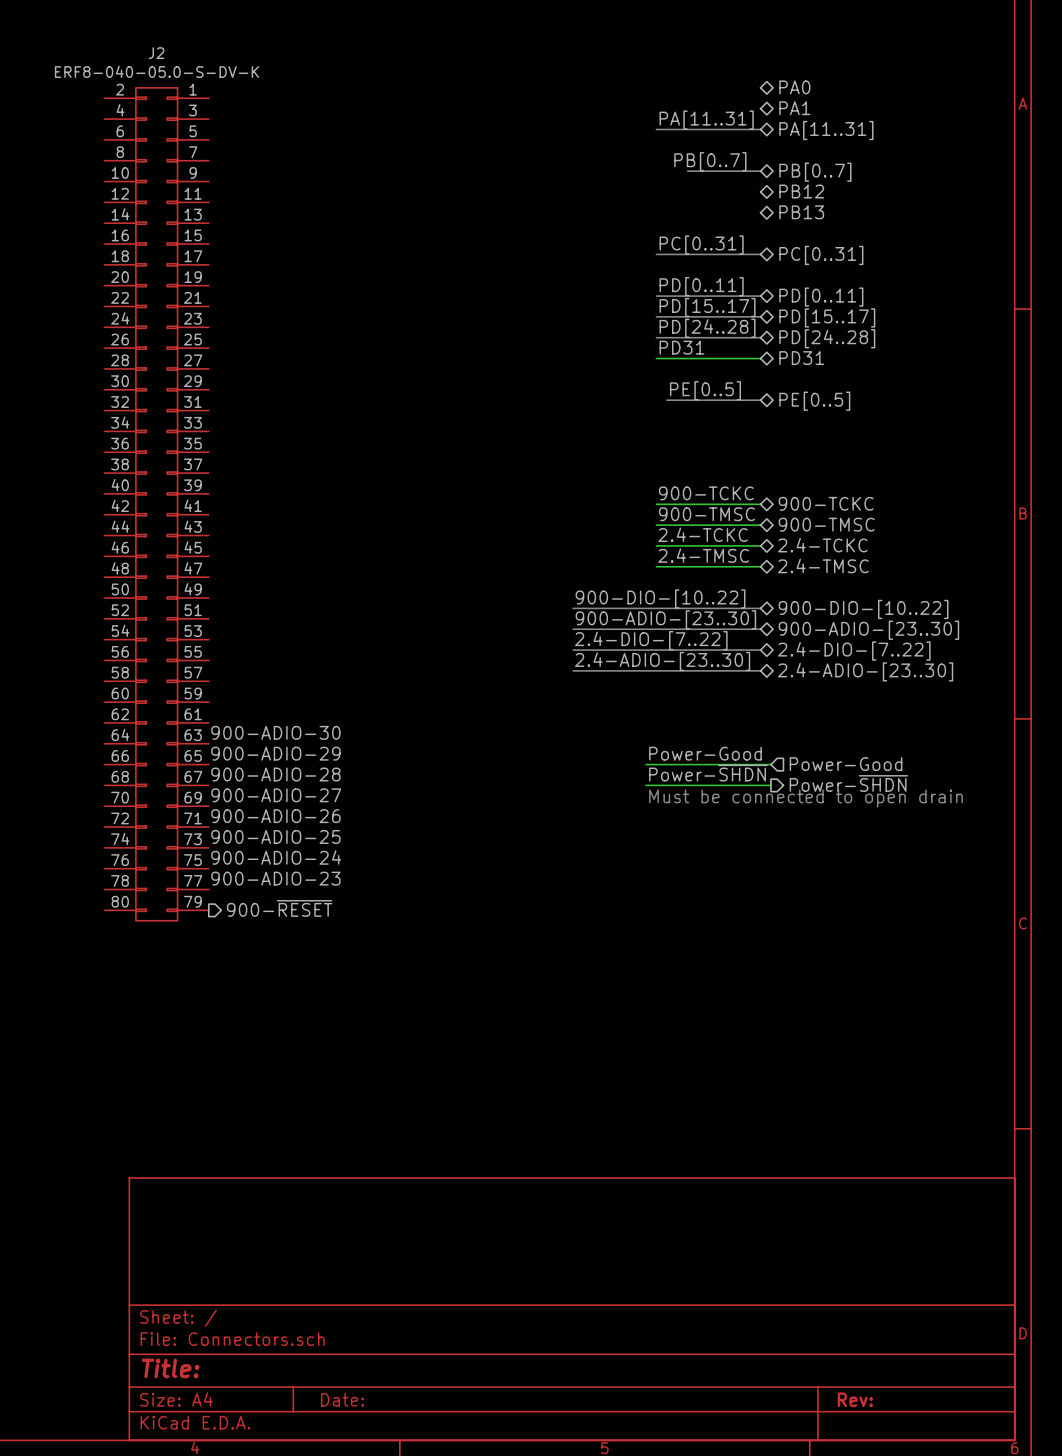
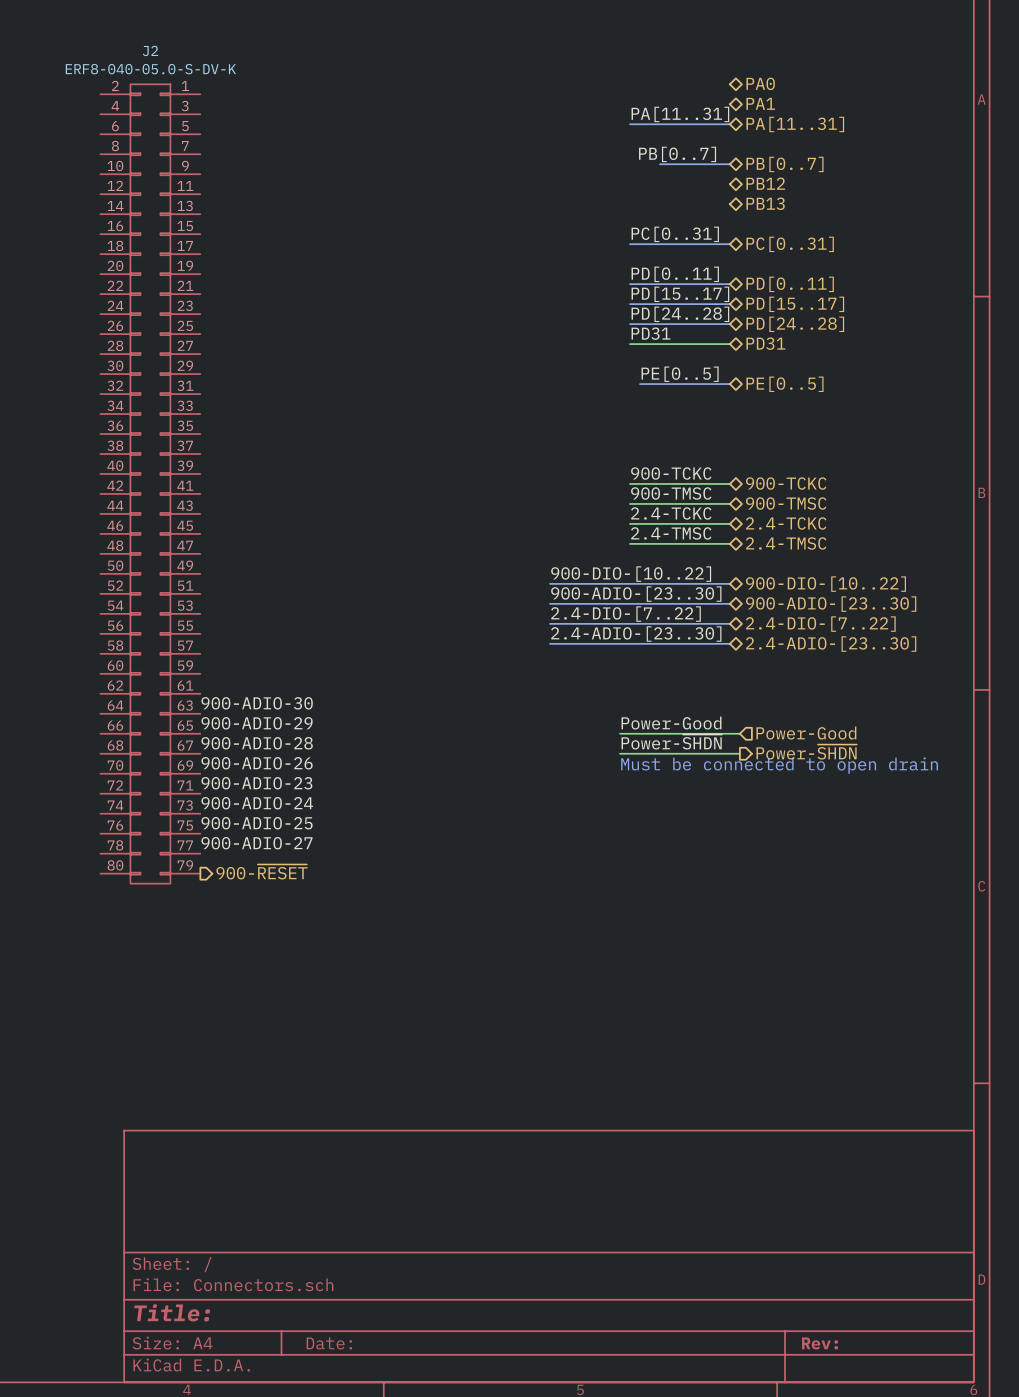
label: 900-ADIO-27 (276, 795) -> 900-ADIO-26 (257, 763)
label: 900-ADIO-26 (275, 816) -> 900-ADIO-23 (256, 783)
label: 900-ADIO-25 (275, 836) -> 900-ADIO-24 (257, 803)
label: 900-ADIO-24 (276, 857) -> 900-ADIO-25 (257, 823)
label: 900-ADIO-23 (275, 878) -> 900-ADIO-27 (257, 843)

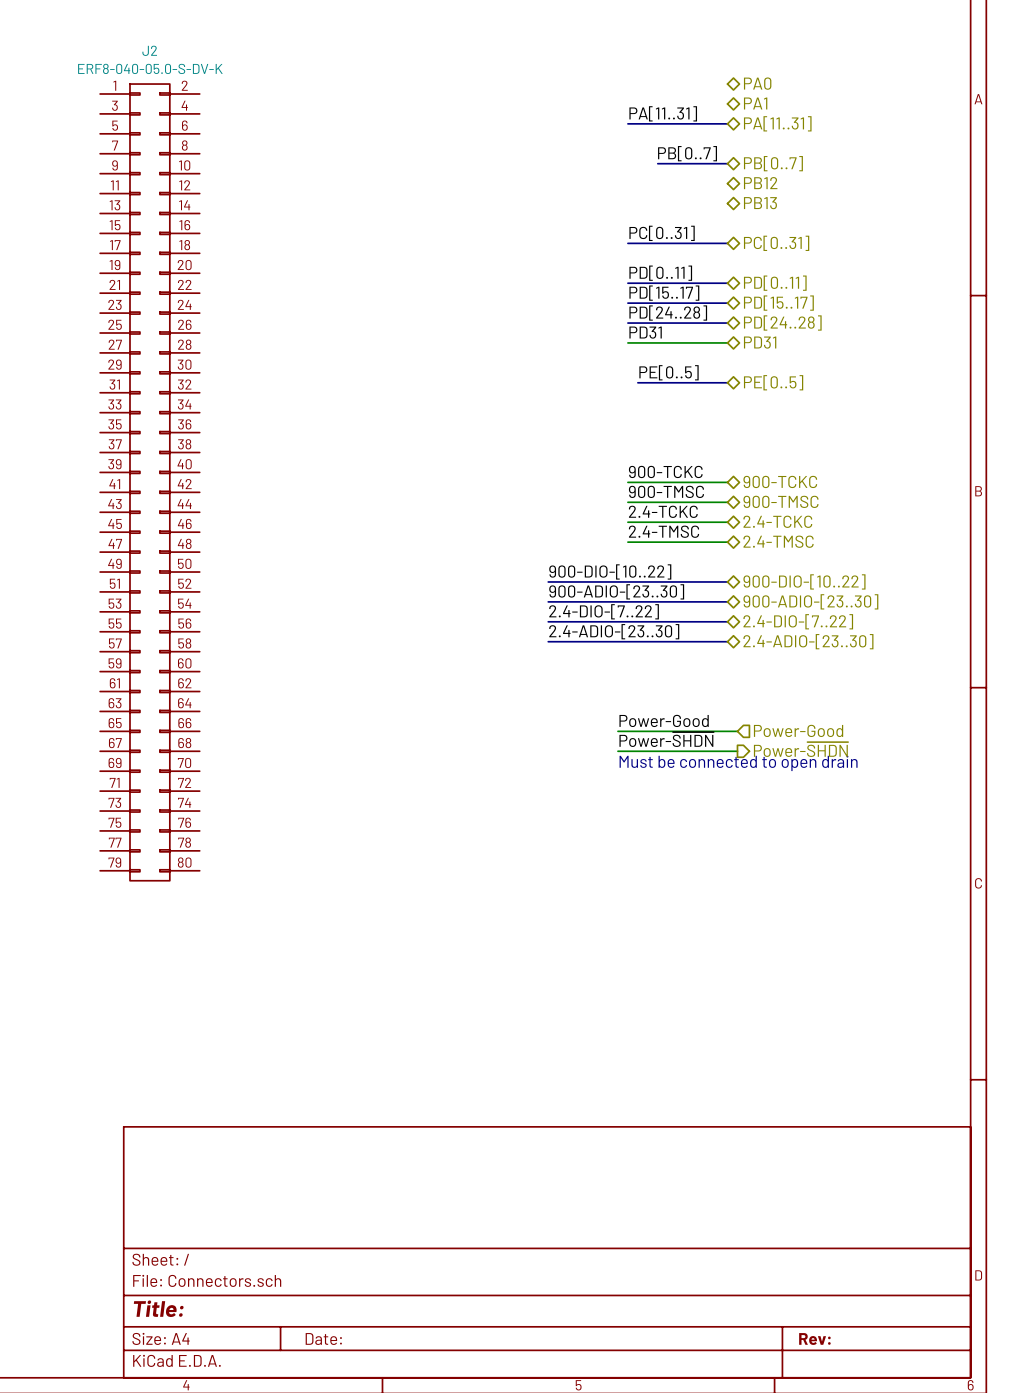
J2 flip: as is (150, 483) -> left-right (149, 482)
label: 900-ADIO-30 (257, 703) -> none
label: 900-ADIO-29 (257, 723) -> none
label: 900-ADIO-28 (257, 743) -> none
label: 900-ADIO-26 (257, 763) -> none
label: 900-ADIO-23 (256, 783) -> none
label: 900-ADIO-24 (257, 803) -> none
label: 900-ADIO-25 (257, 823) -> none
label: 900-ADIO-27 (257, 843) -> none
hierarchical label: 900-~{RESET} (262, 871) -> none

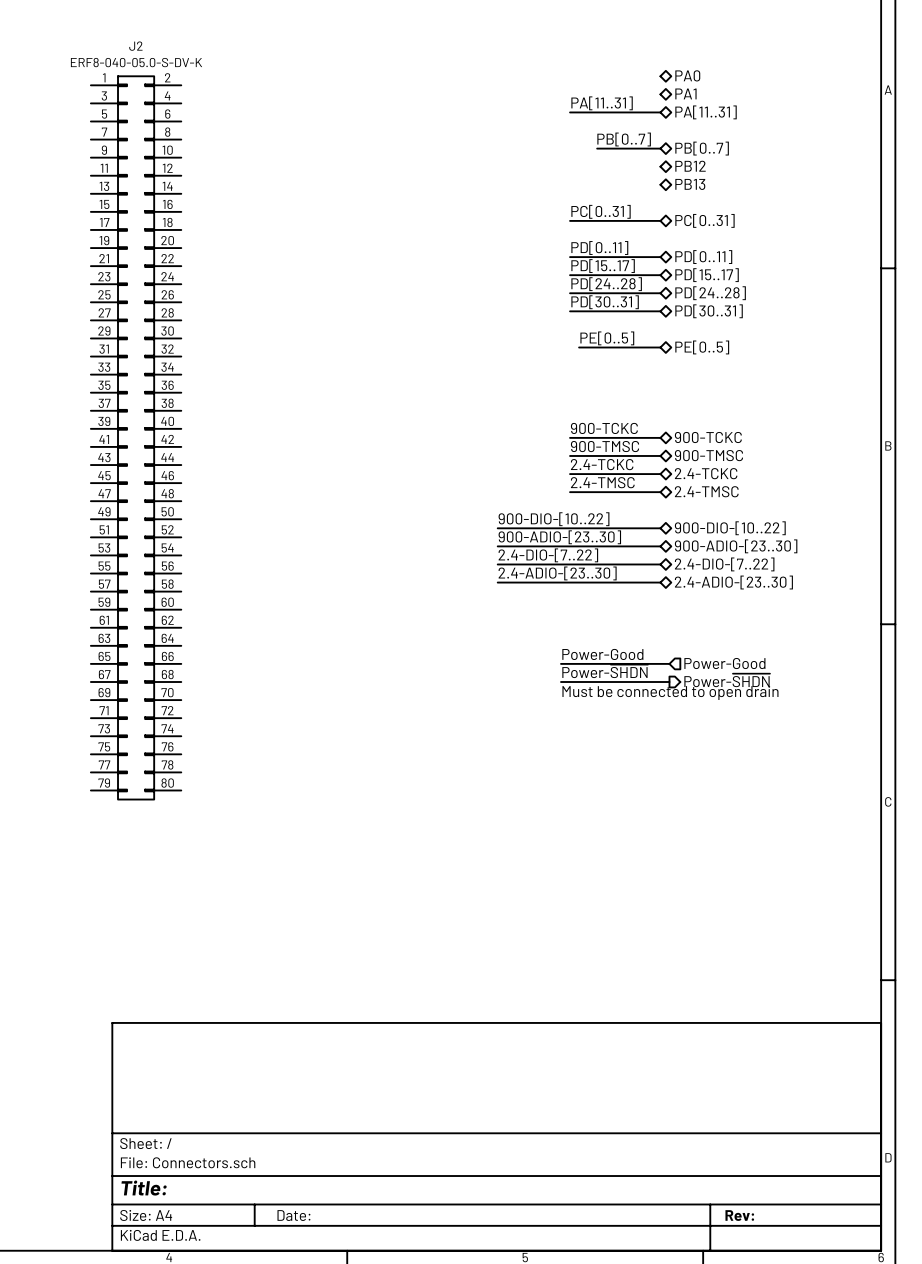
label: PD31 (645, 332) -> PD[30..31] (605, 302)
bus: none -> (570, 311) (660, 311)
hierarchical label: PD31 (760, 342) -> PD[30..31] (709, 311)

